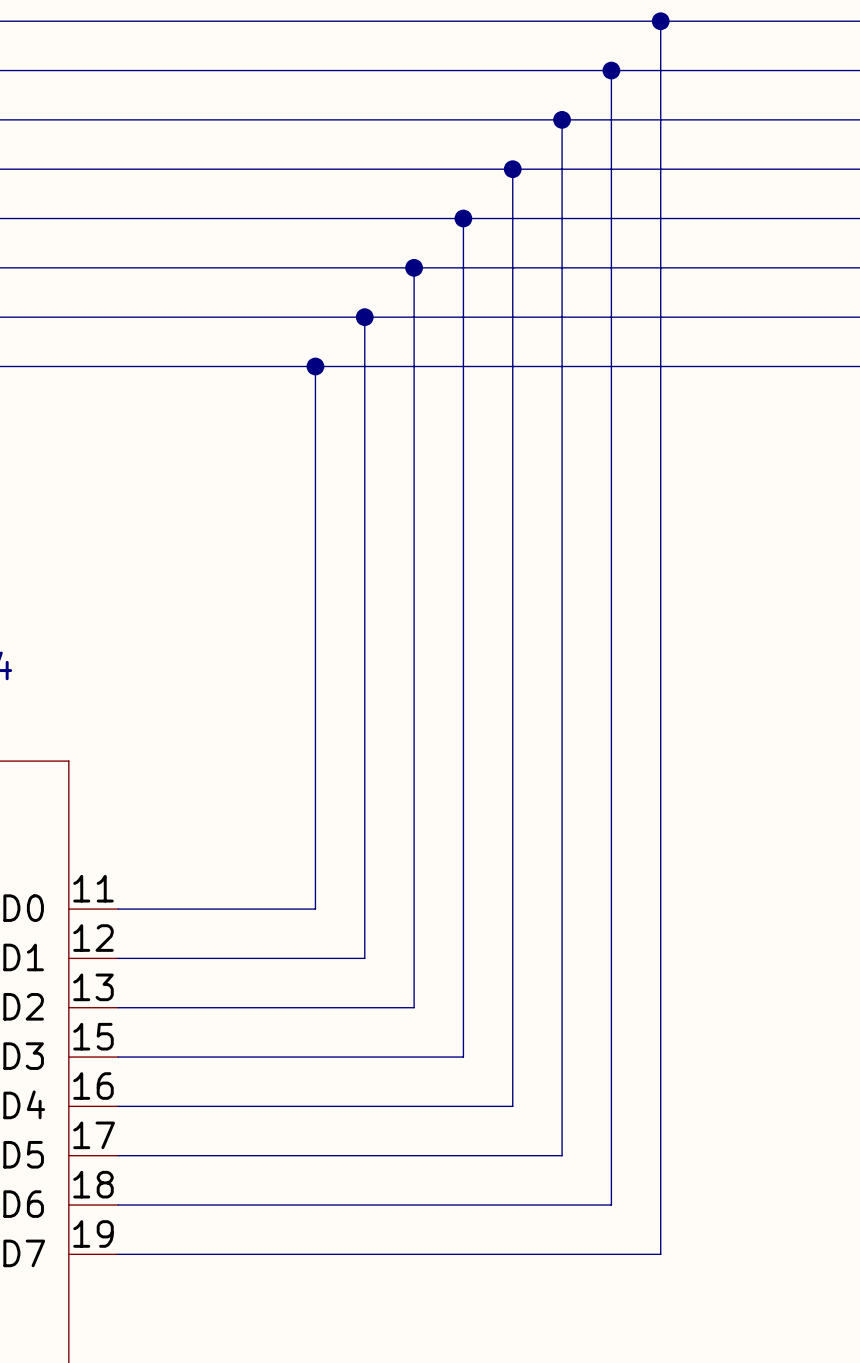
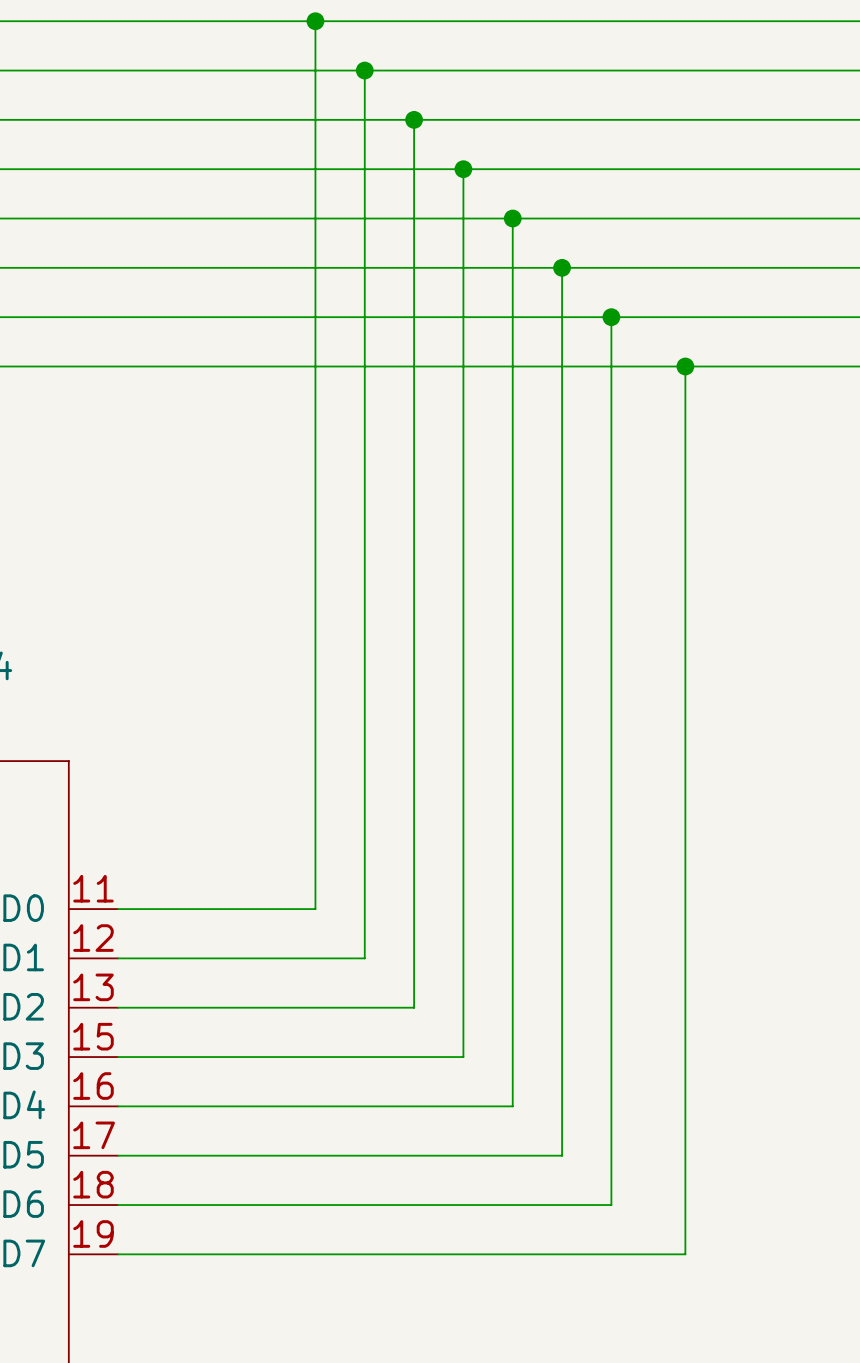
wire: none -> (315, 21) (315, 366)
junction: none -> (315, 21)
wire: (660, 21) (660, 1254) -> (685, 366) (685, 1254) (660, 1254)
junction: (660, 21) -> none
junction: none -> (364, 70)
wire: (611, 70) (611, 317) -> (364, 70) (364, 317)
junction: (611, 70) -> none
junction: none -> (414, 119)
wire: (562, 119) (562, 267) -> (414, 119) (414, 267)
junction: (562, 119) -> none
junction: none -> (463, 169)
wire: (512, 169) (512, 218) -> (463, 169) (463, 218)
junction: (512, 169) -> none
junction: (463, 218) -> none
junction: none -> (512, 218)
junction: (414, 267) -> none
junction: none -> (562, 267)
junction: (364, 317) -> none
junction: none -> (611, 317)
junction: (315, 366) -> none
junction: none -> (685, 366)

